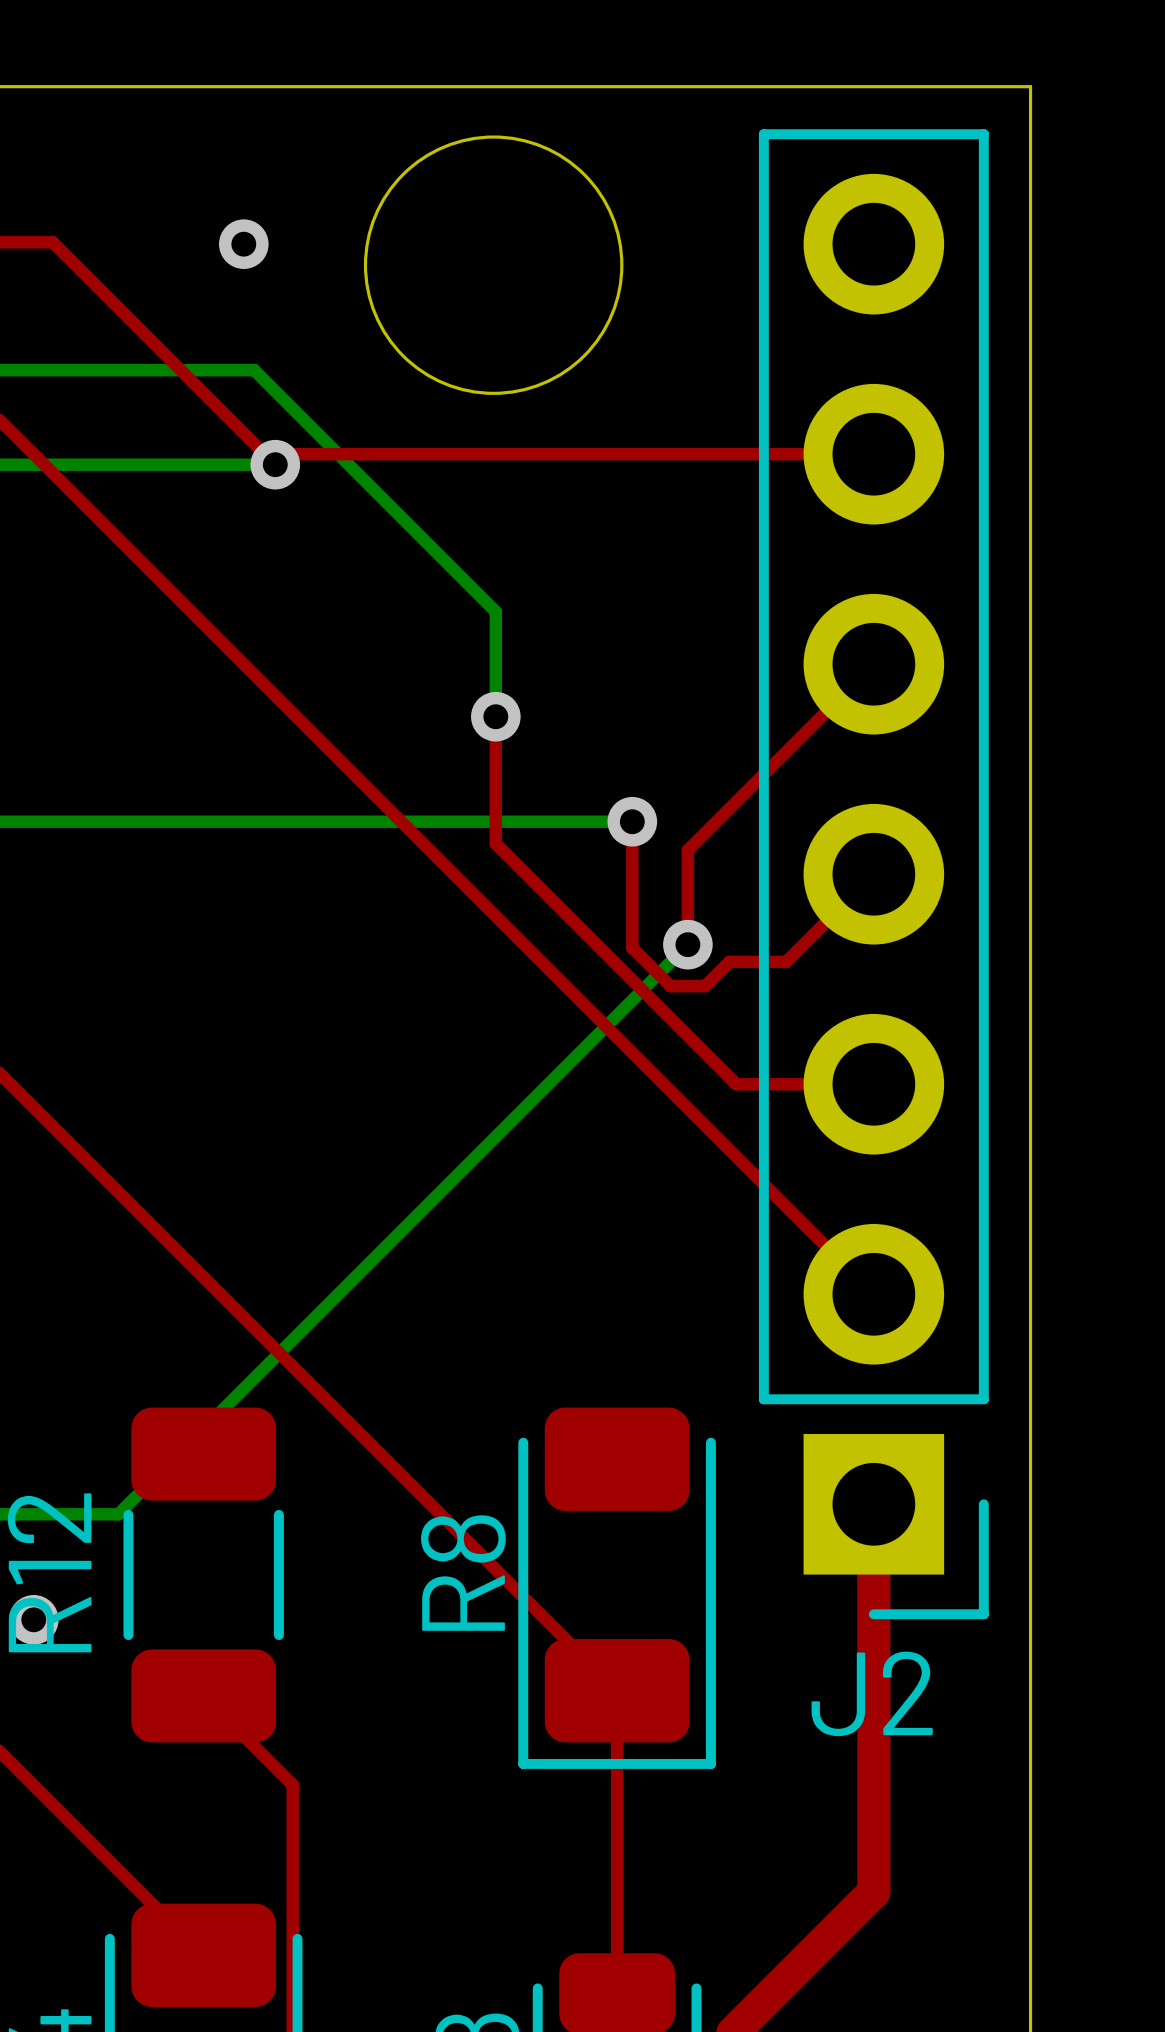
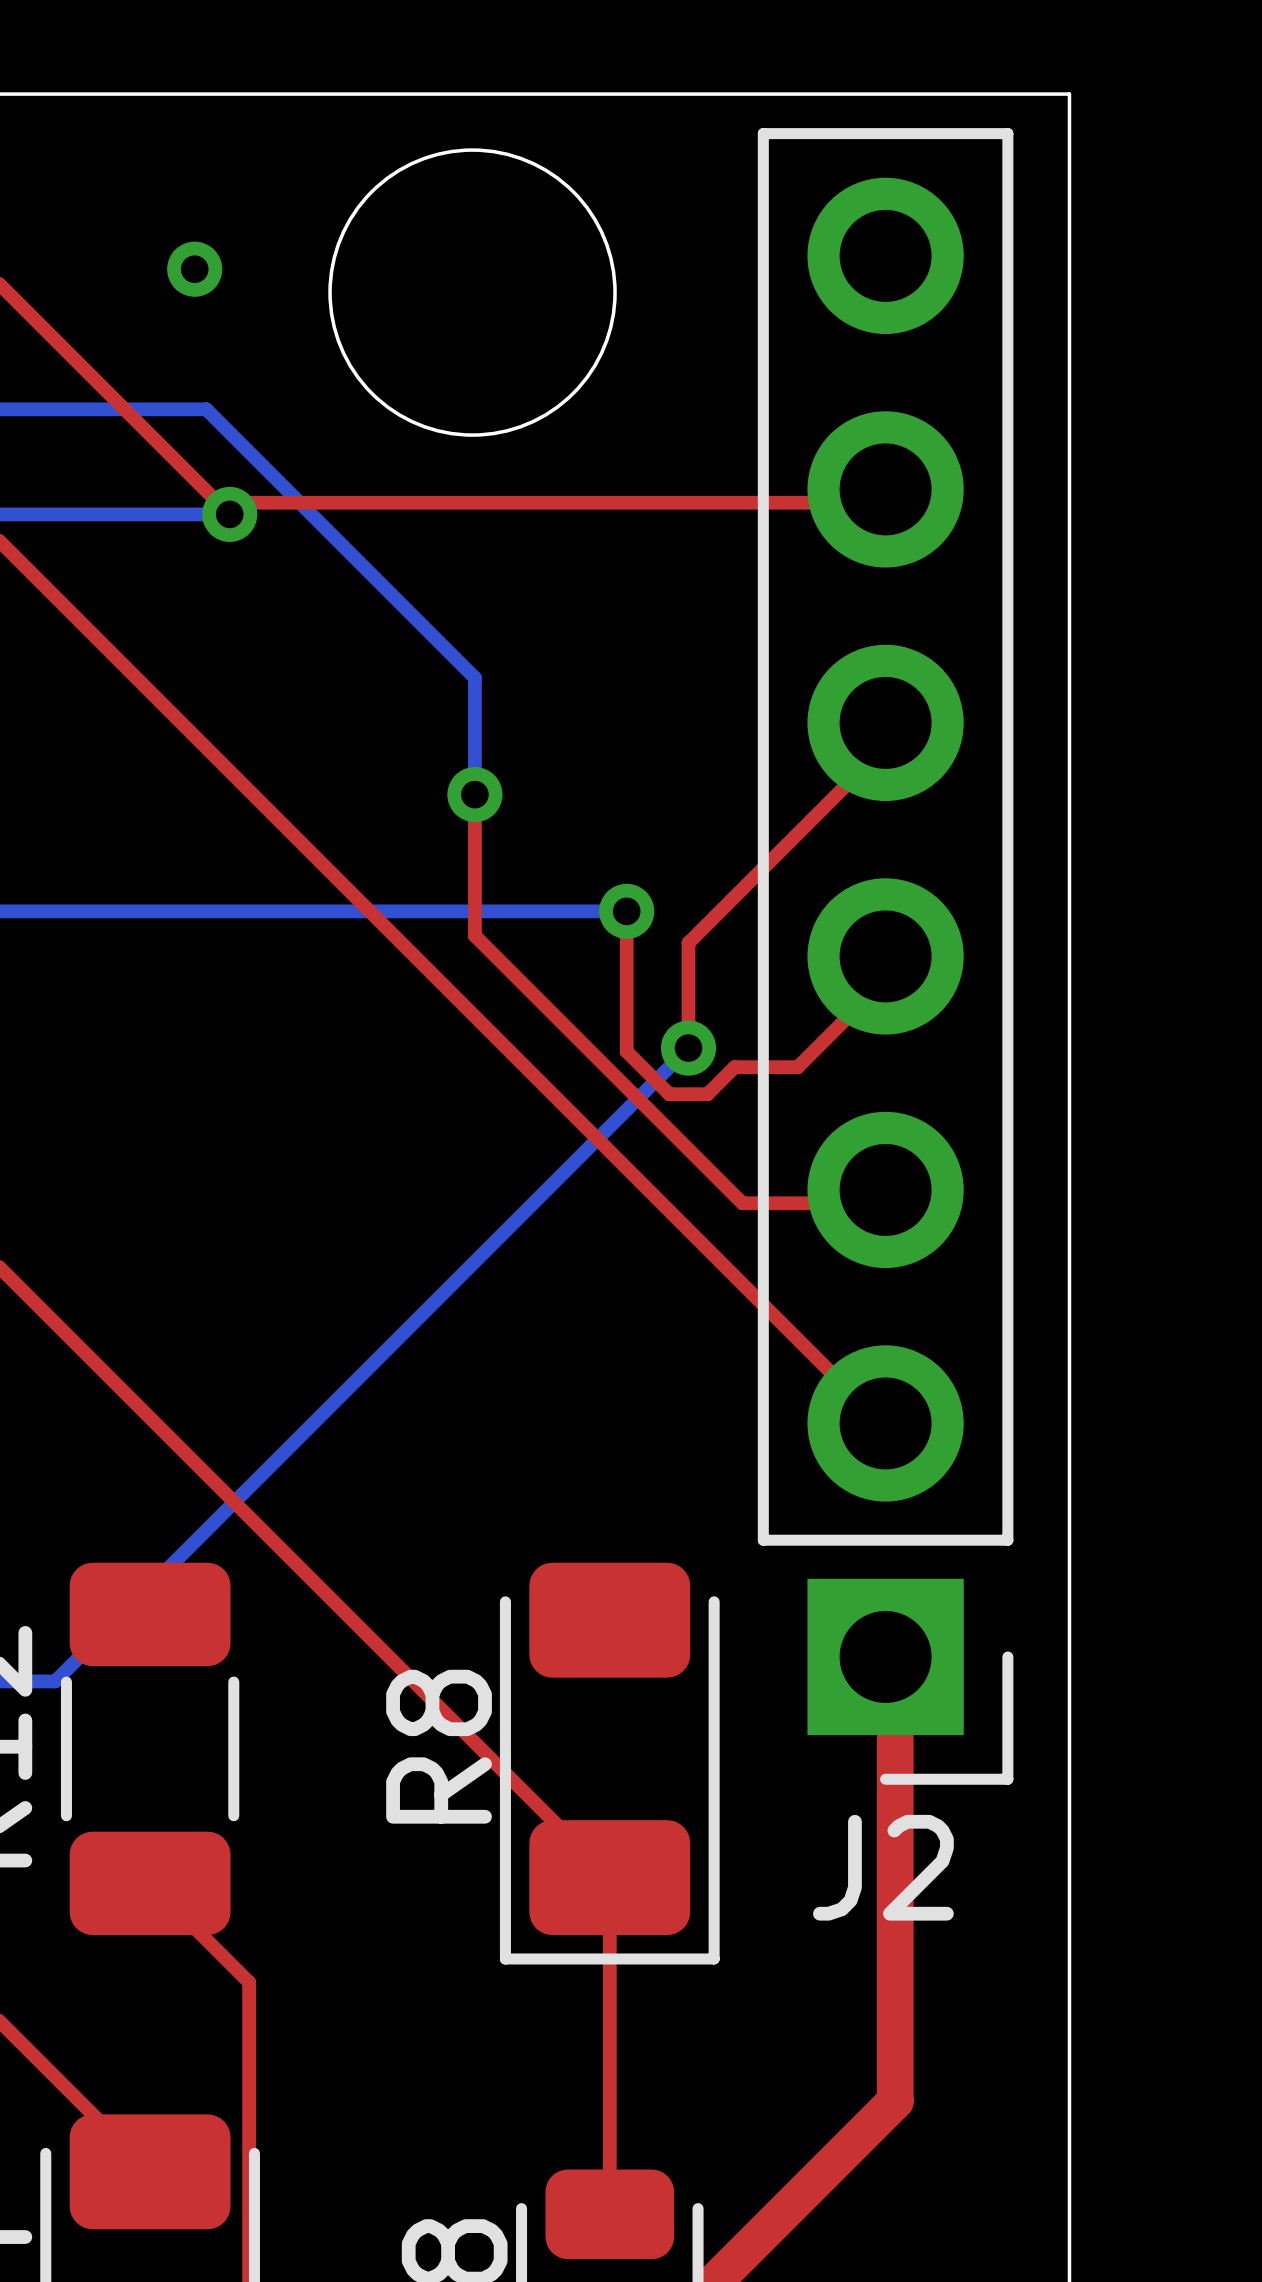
J2 position: (873, 874) -> (885, 956)

